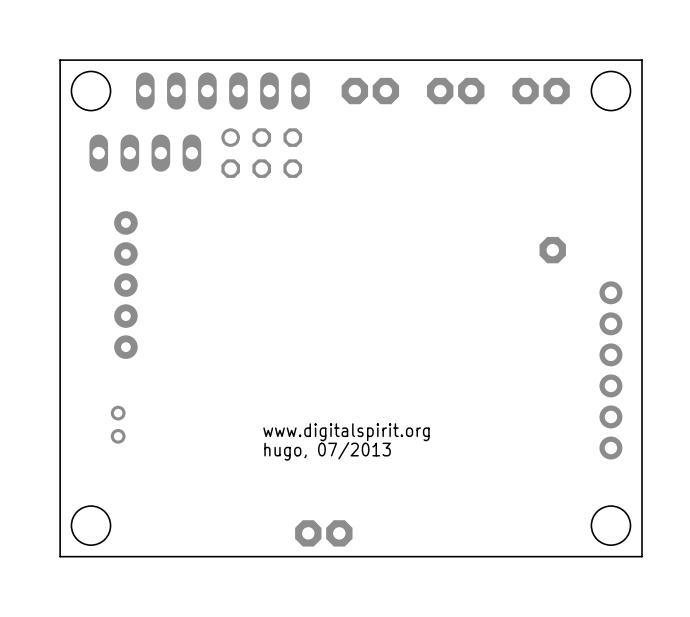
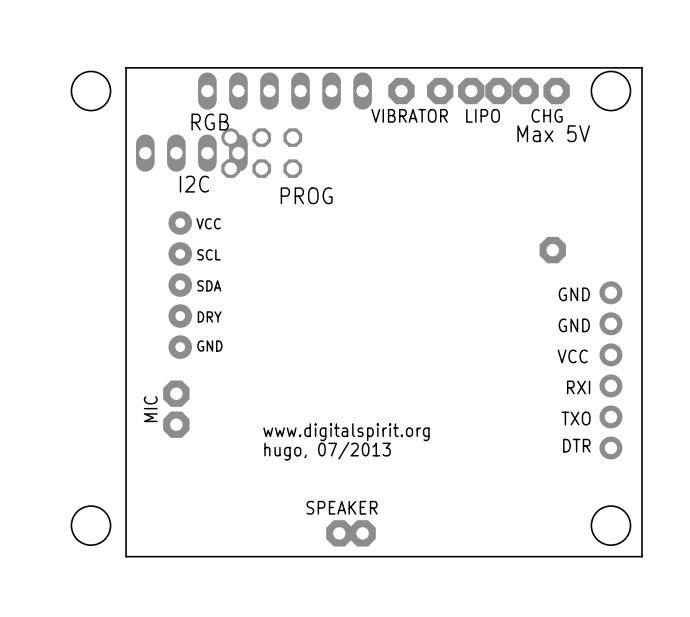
board edge: (641, 67) (641, 60) (60, 60) (60, 556) (126, 556) -> (641, 67) (126, 67) (126, 556)
part position: (222, 91) -> (285, 91)
part: (354, 91) -> none
part position: (385, 91) -> (401, 91)
part: none -> (498, 91)
text: none -> VIBRATOR (409, 115)
text: none -> LIPO (483, 115)
text: none -> CHG (547, 115)
text: none -> RGB (210, 122)
text: none -> Max 5V (553, 133)
part position: (145, 153) -> (191, 153)
text: none -> I2C (194, 184)
text: none -> PROG (306, 195)
text: none -> VCC (208, 223)
text: none -> SCL (209, 254)
part position: (125, 285) -> (180, 285)
text: none -> SDA (209, 285)
text: none -> GND (574, 294)
text: none -> DRY (209, 316)
text: none -> GND (574, 325)
text: none -> GND (209, 346)
text: none -> VCC (572, 356)
text: none -> RXI (578, 387)
part: none -> (176, 393)
text: none -> MIC (150, 409)
text: none -> TXO (576, 418)
part: (118, 424) -> none
part: none -> (176, 424)
text: none -> DTR (576, 445)
text: none -> SPEAKER (342, 507)
part position: (308, 533) -> (362, 533)

